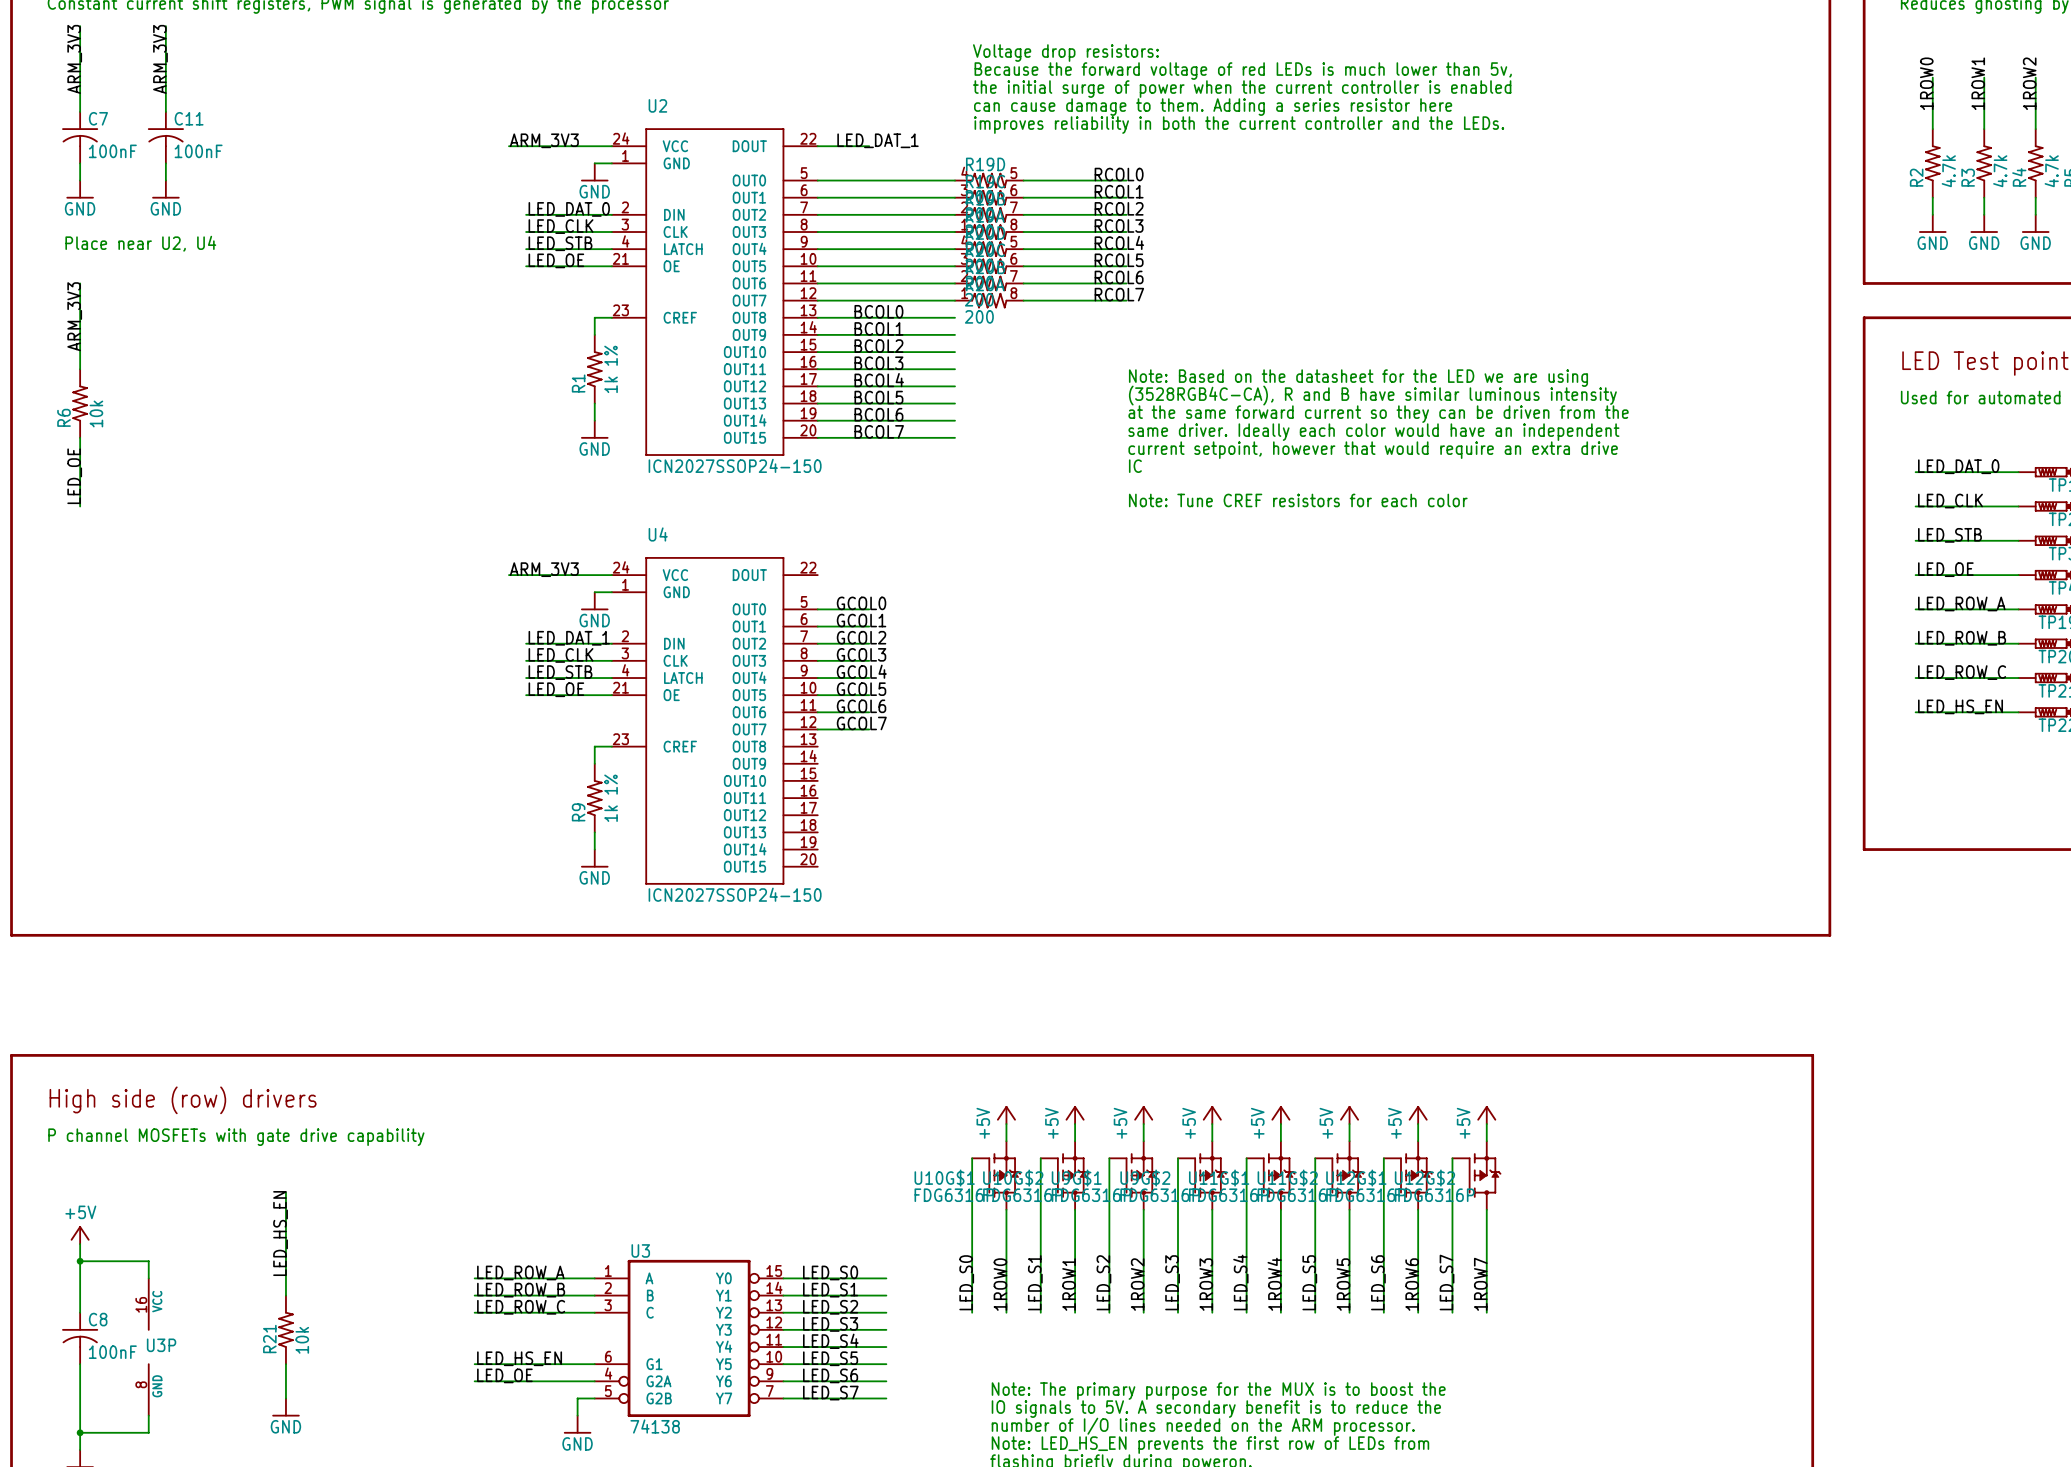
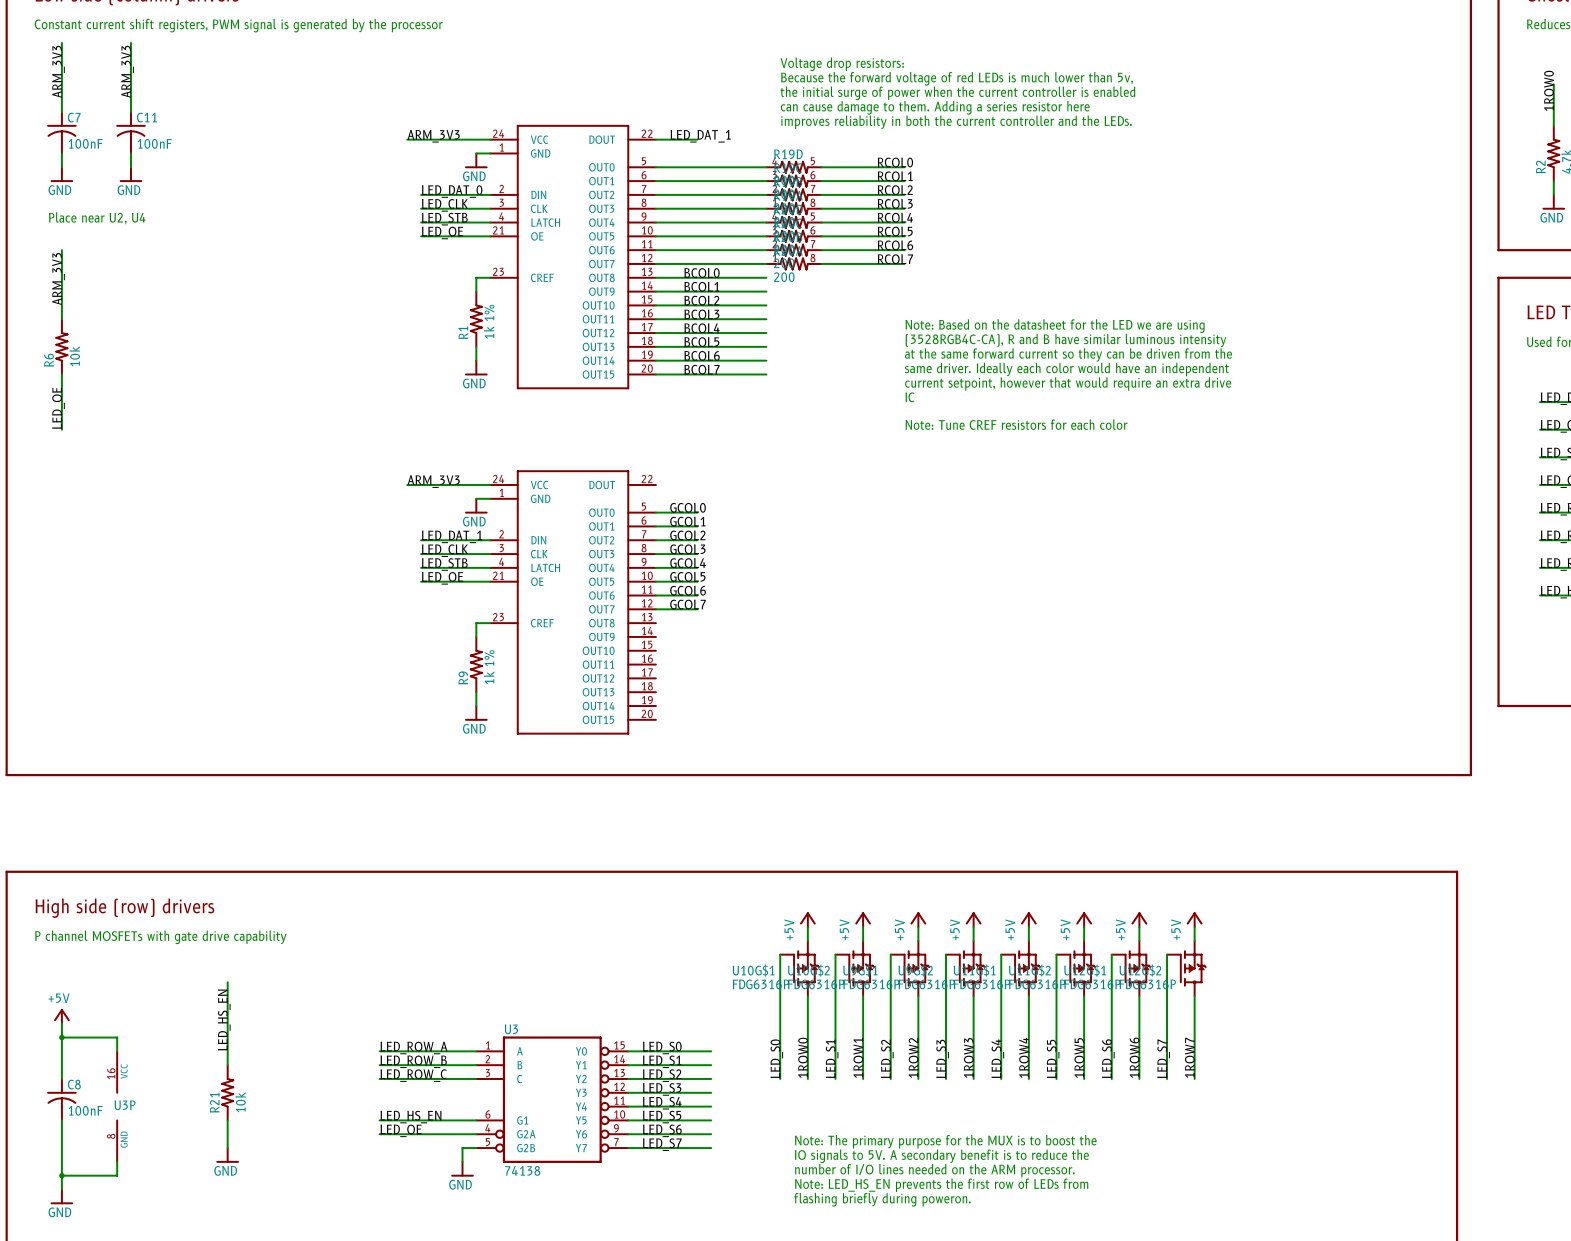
U2 name: U2 (657, 105) -> none
U2 value: ICN2027SSOP24-150 (735, 465) -> none
U4 name: U4 (658, 534) -> none
U4 value: ICN2027SSOP24-150 (735, 894) -> none

